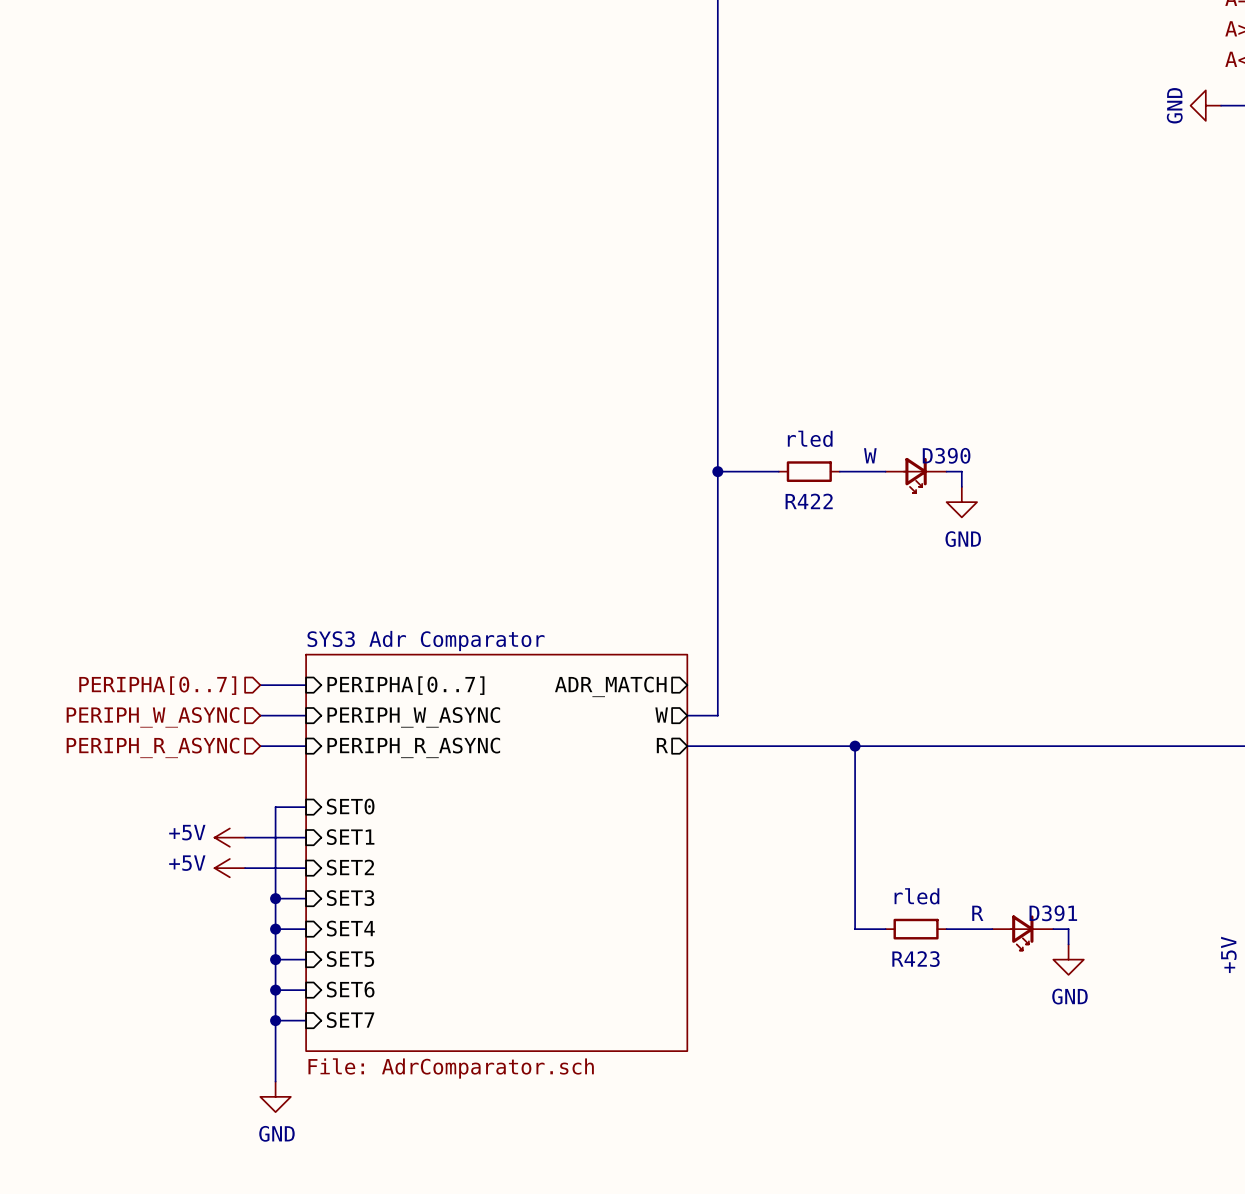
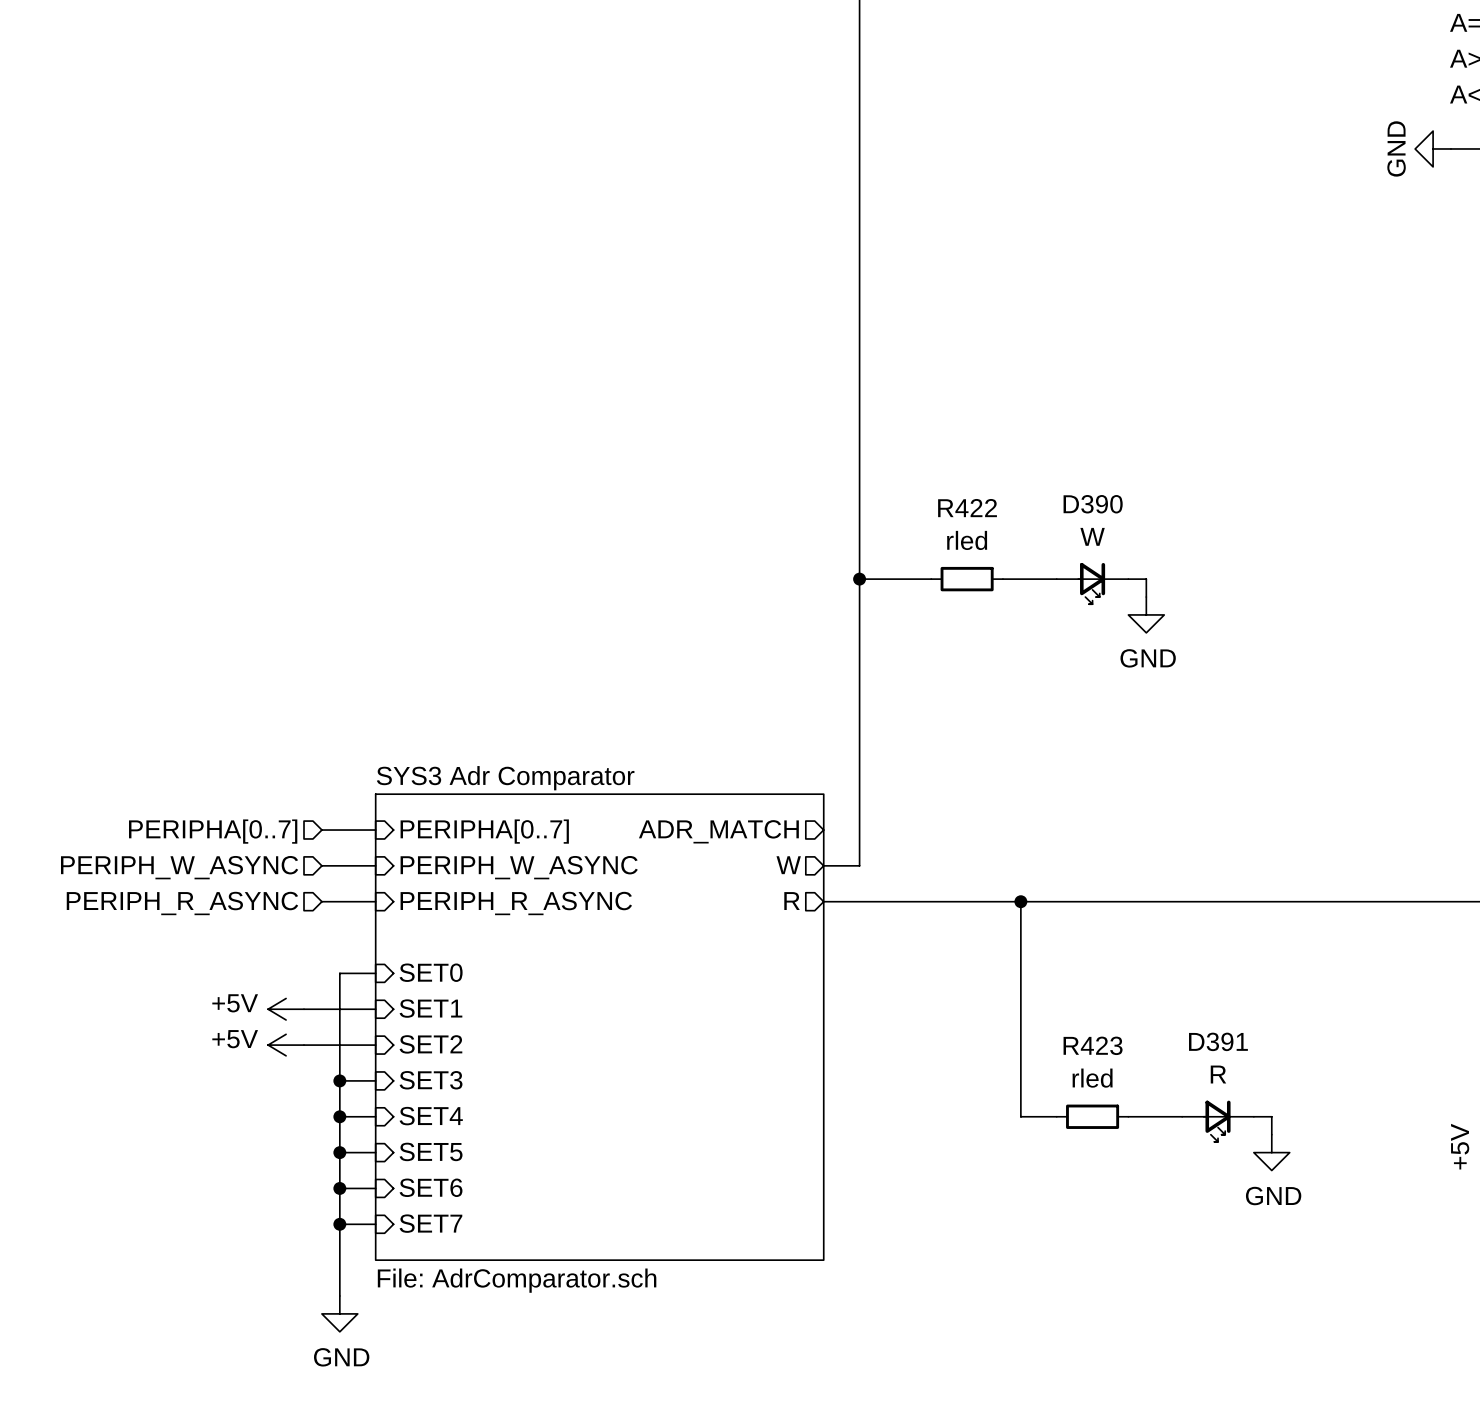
D390 value position: W (870, 455) -> W (1092, 536)
D390 name position: D390 (946, 455) -> D390 (1093, 504)
R422 name position: R422 (809, 501) -> R422 (967, 508)
D391 value position: R (977, 913) -> R (1218, 1074)
D391 name position: D391 (1053, 913) -> D391 (1218, 1041)
R423 name position: R423 (916, 959) -> R423 (1093, 1045)

